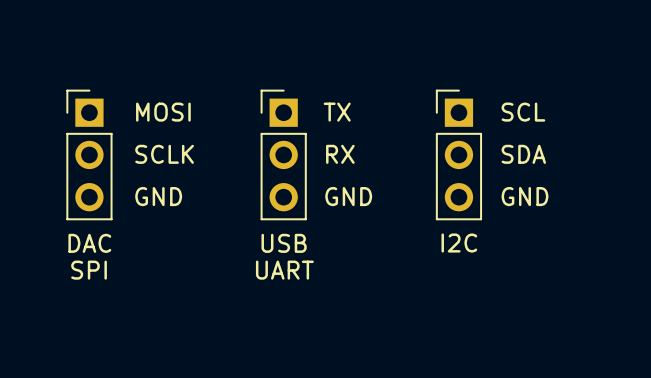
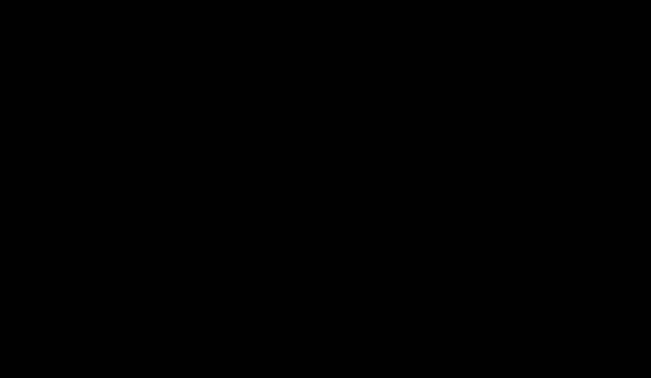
text: MOSI (163, 112) -> none
text: TX (337, 112) -> none
text: SCL (523, 112) -> none
part: (89, 154) -> none
text: SCLK (164, 154) -> none
part: (283, 154) -> none
text: RX (340, 154) -> none
part: (458, 154) -> none
text: SDA (523, 154) -> none
text: GND (158, 196) -> none
text: GND (348, 196) -> none
text: GND (524, 196) -> none
text: DAC (89, 243) -> none
text: USB (284, 243) -> none
text: I2C (459, 243) -> none
text: SPI (89, 270) -> none
text: UART (284, 270) -> none

